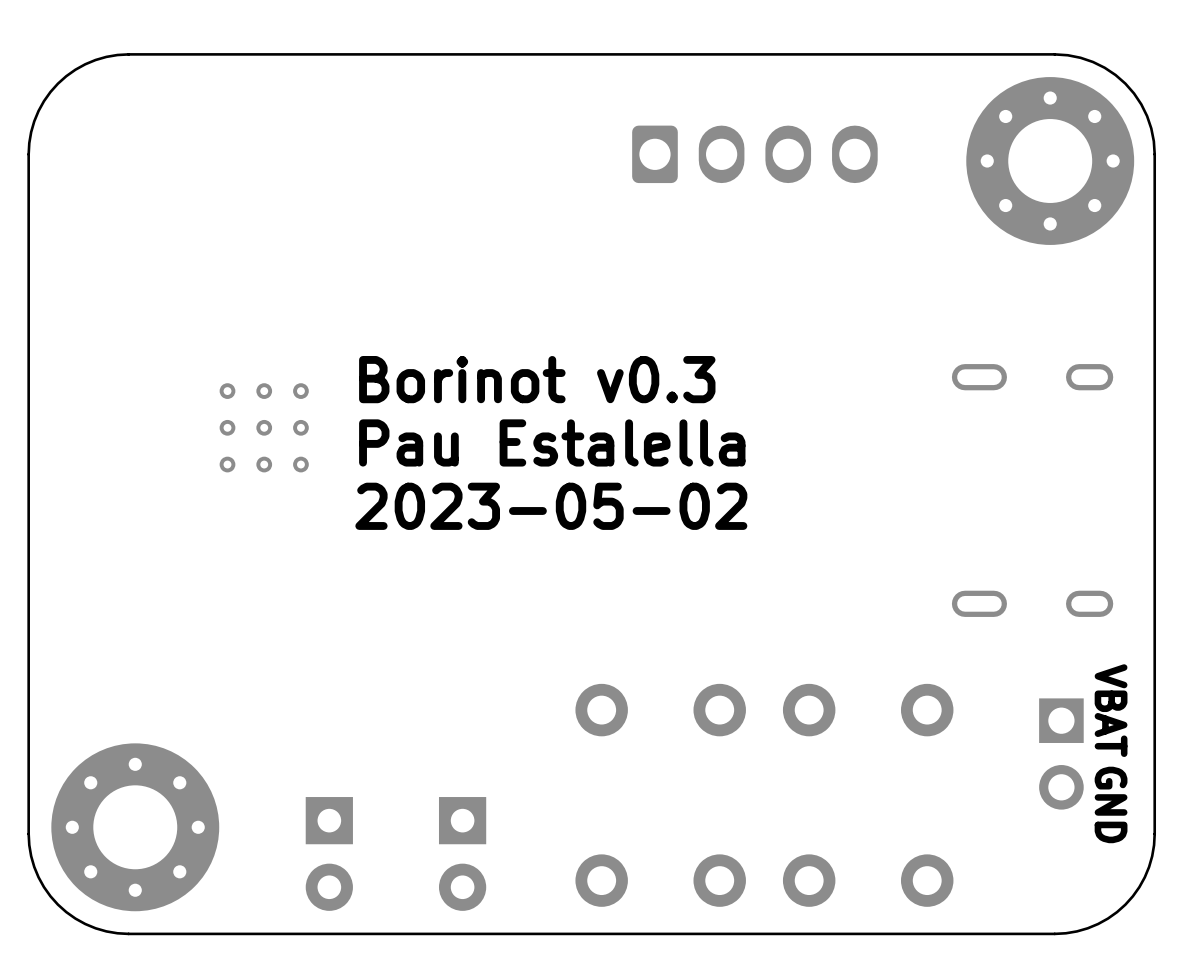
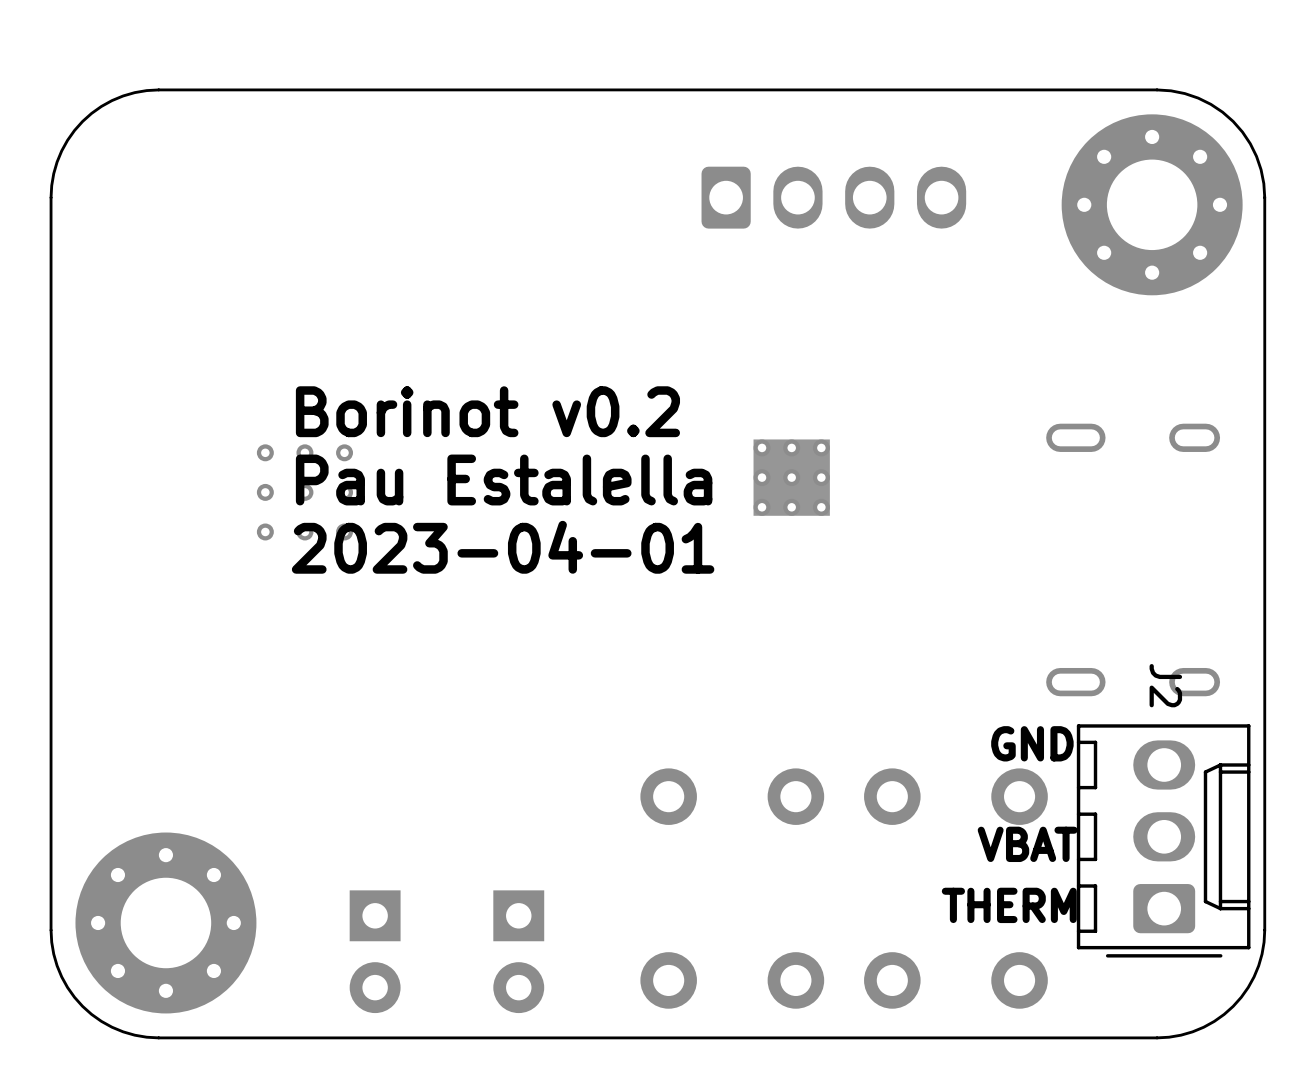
text: Borinot v0.3 (537, 379) -> Borinot v0.2 (487, 411)
part: none -> (791, 477)
text position: Pau Estalella (552, 442) -> Pau Estalella (504, 480)
text: 2023-05-02 (551, 506) -> 2023-04-01 (503, 547)
text rotation: 0° (1111, 710) -> 90° counterclockwise (1027, 844)
text position: VBAT (1111, 710) -> VBAT (1027, 844)
J2: none -> (1163, 840)
part: (1061, 754) -> none
text rotation: 0° (1111, 804) -> 90° counterclockwise (1032, 743)
text position: GND (1111, 804) -> GND (1032, 743)
text: none -> THERM (1009, 905)

